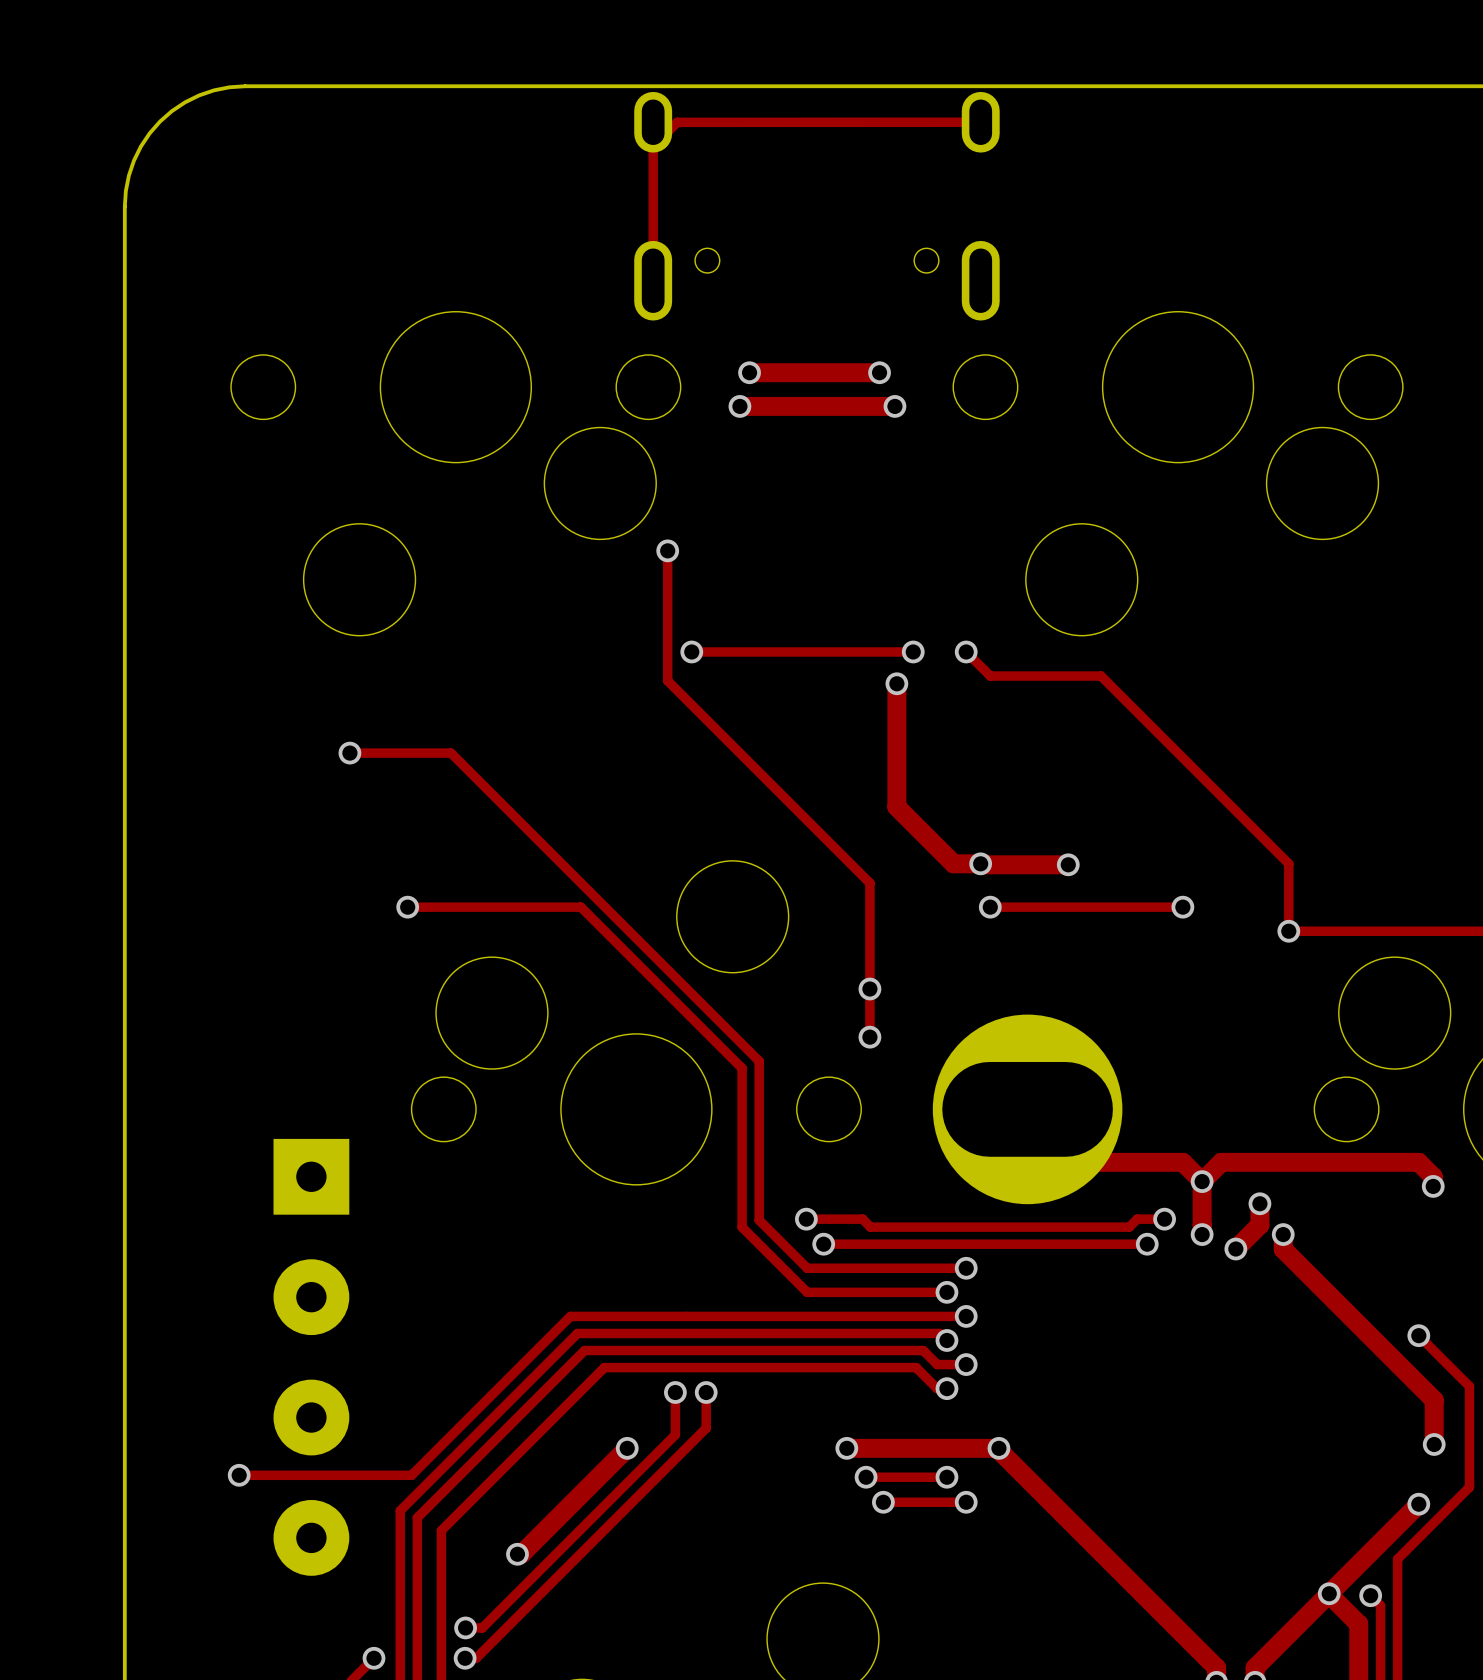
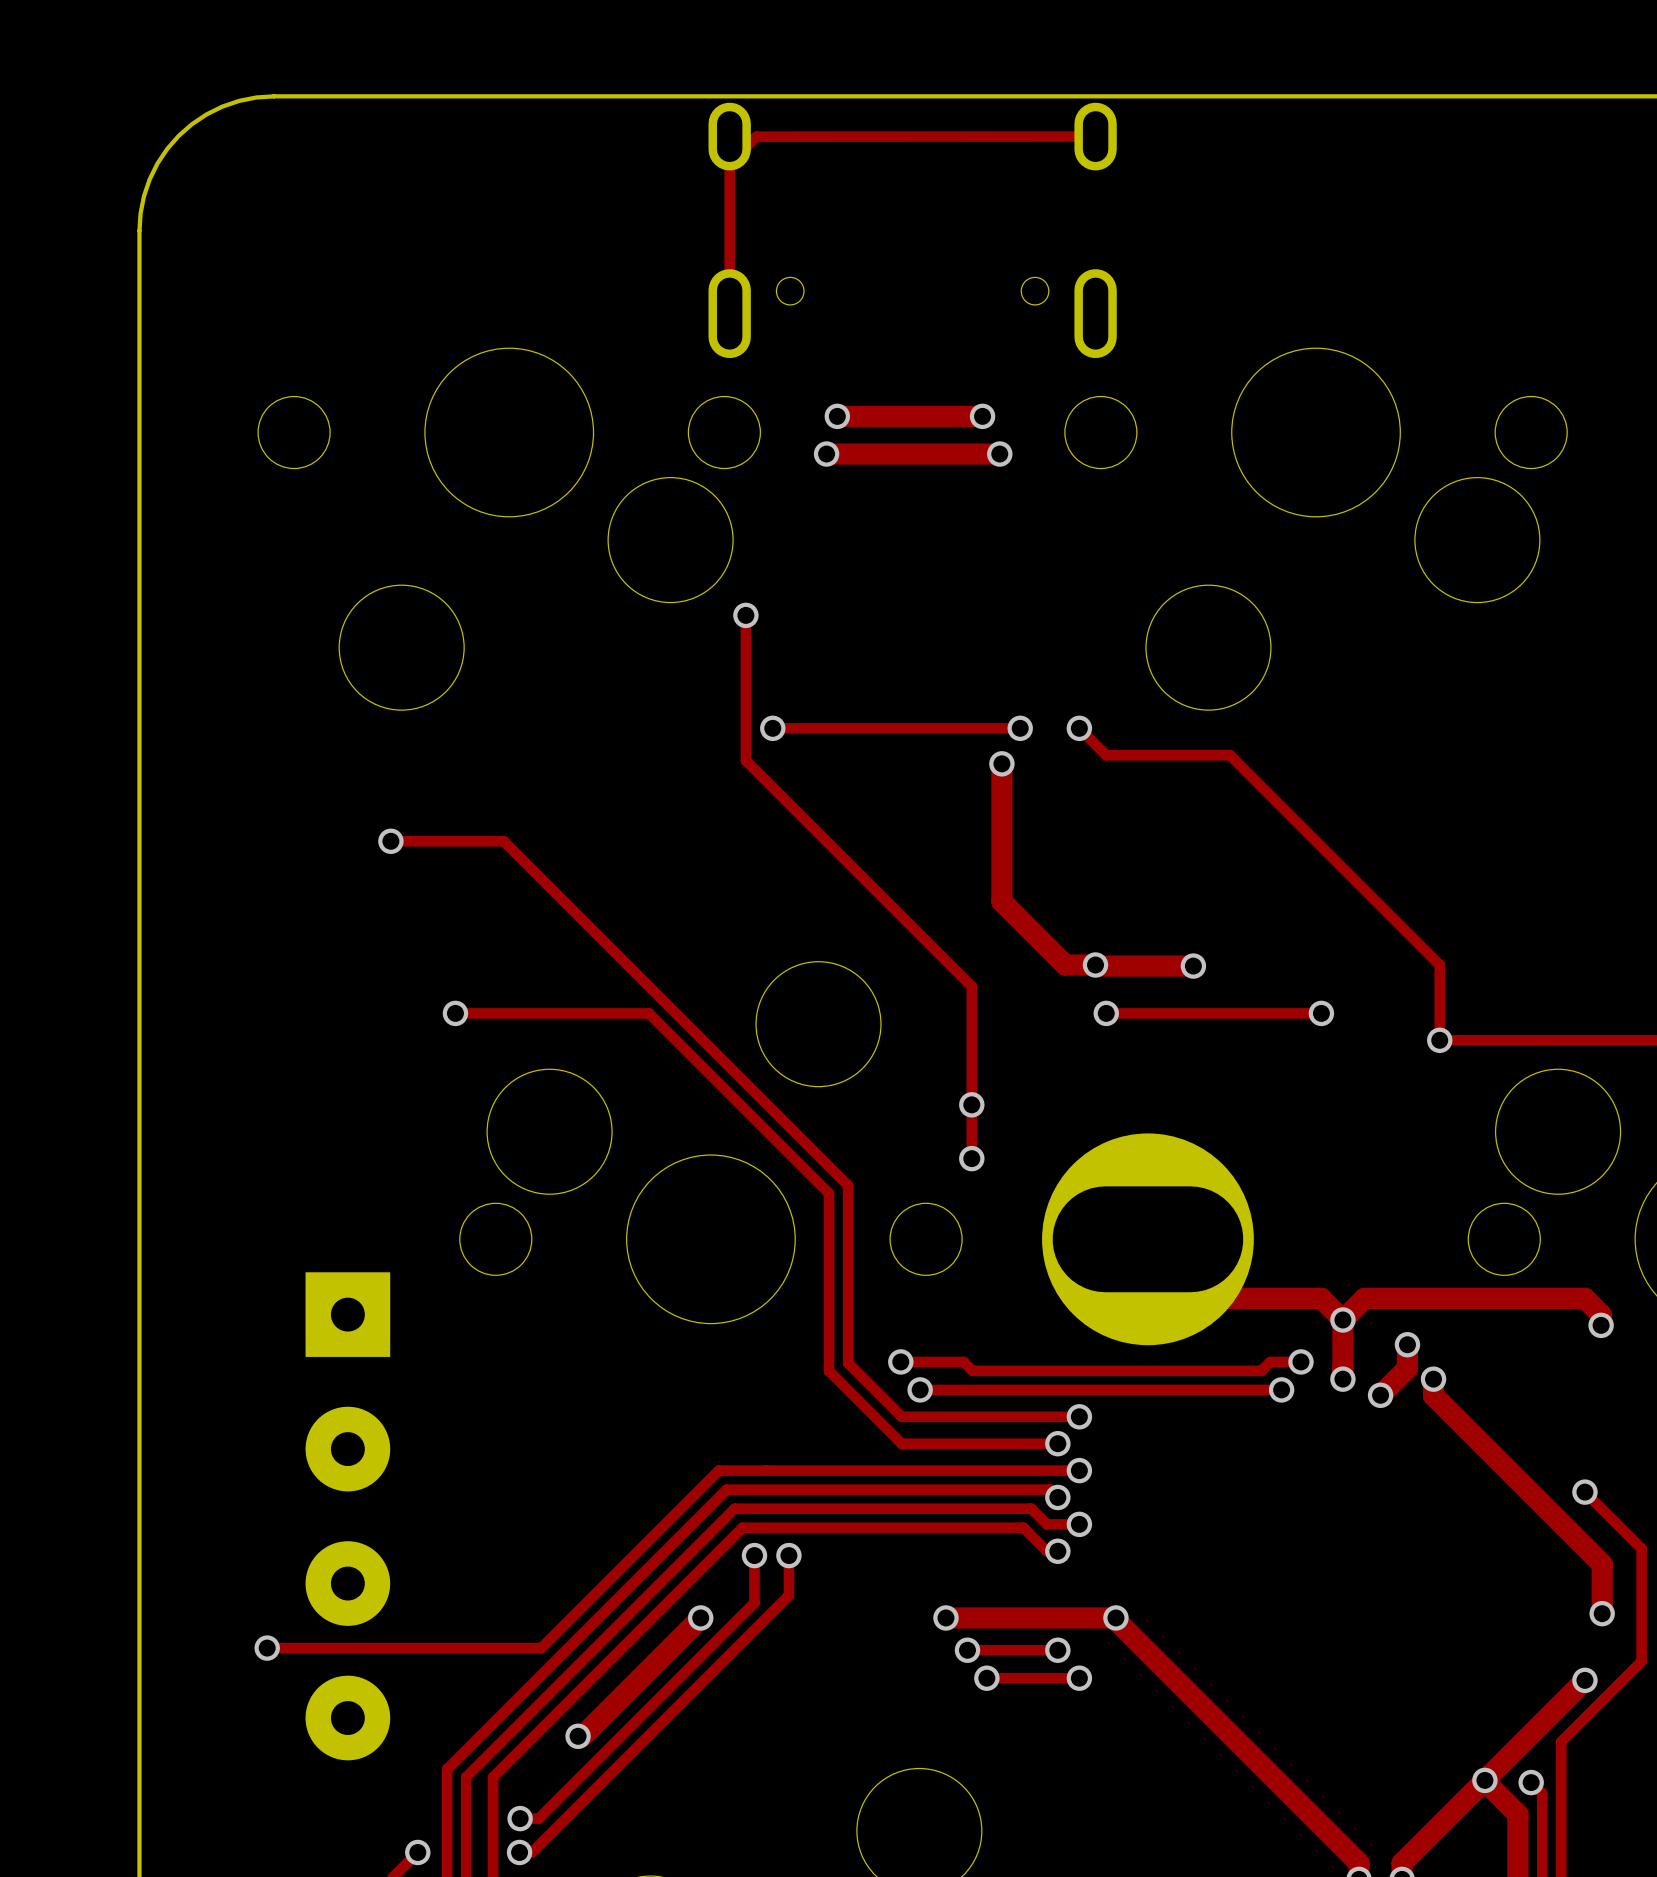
track: (643, 1316) (570, 1316) (411, 1475) -> (718, 1470) (541, 1648) (459, 1648)
track: (650, 1333) (577, 1333) (400, 1510) (400, 1583) -> (726, 1489) (447, 1769)
track: (657, 1350) (584, 1350) (417, 1517) (417, 1590) -> (734, 1508) (466, 1777)
track: (664, 1367) (604, 1367) (441, 1530) (441, 1590) -> (742, 1527) (493, 1777)

